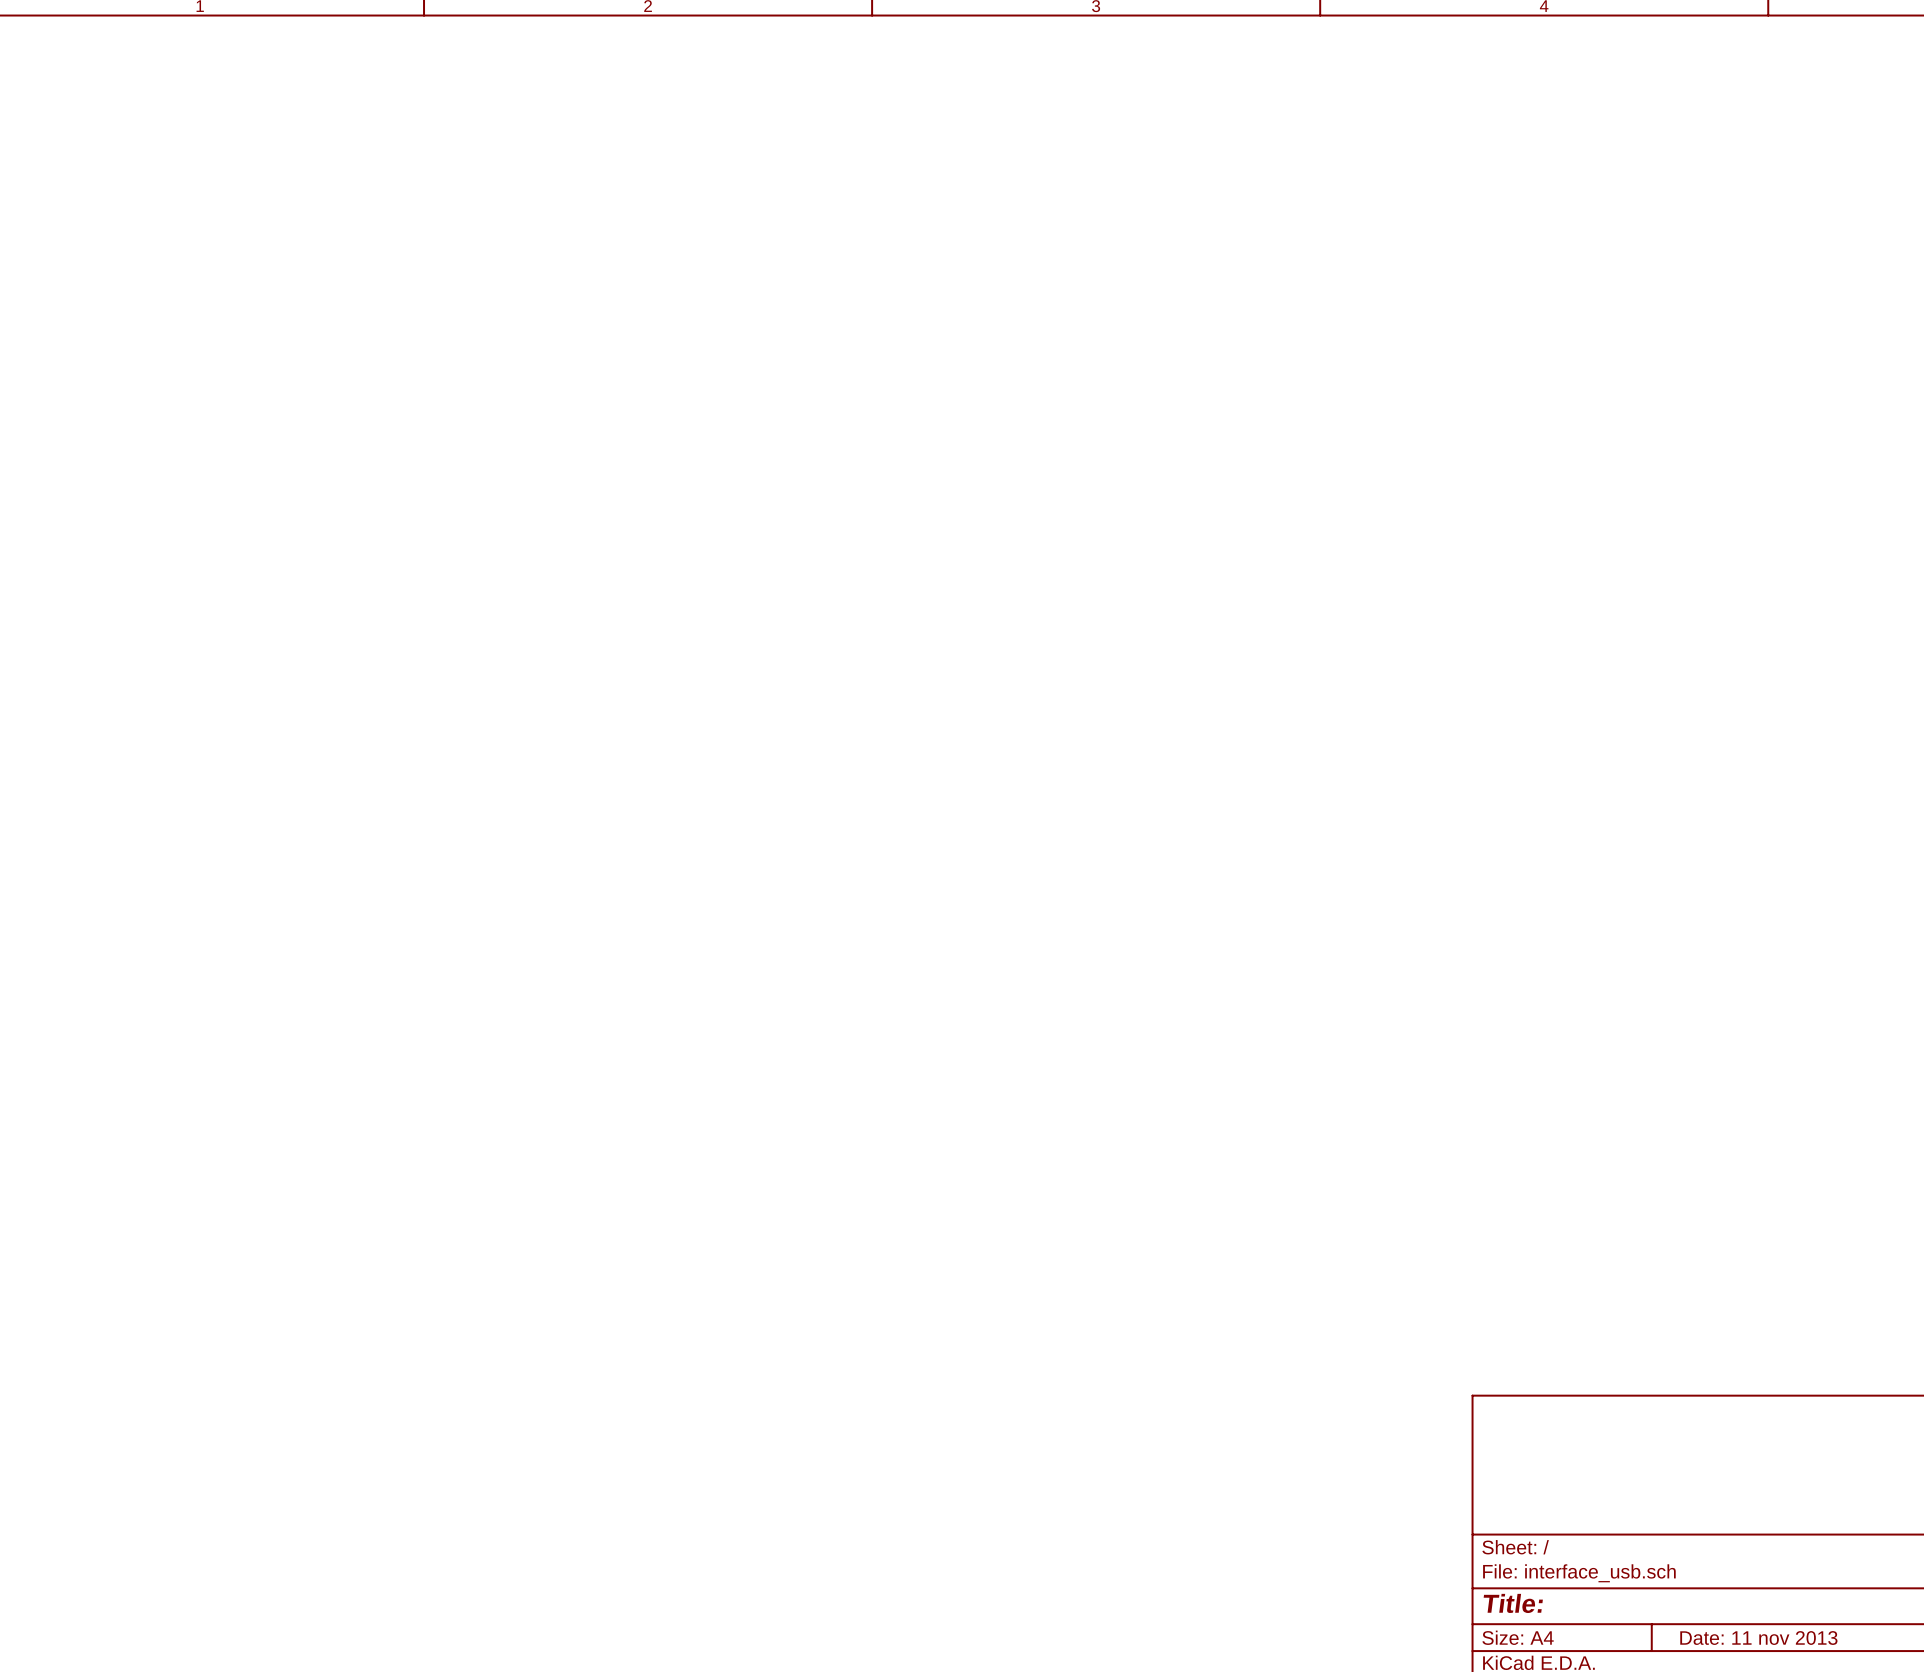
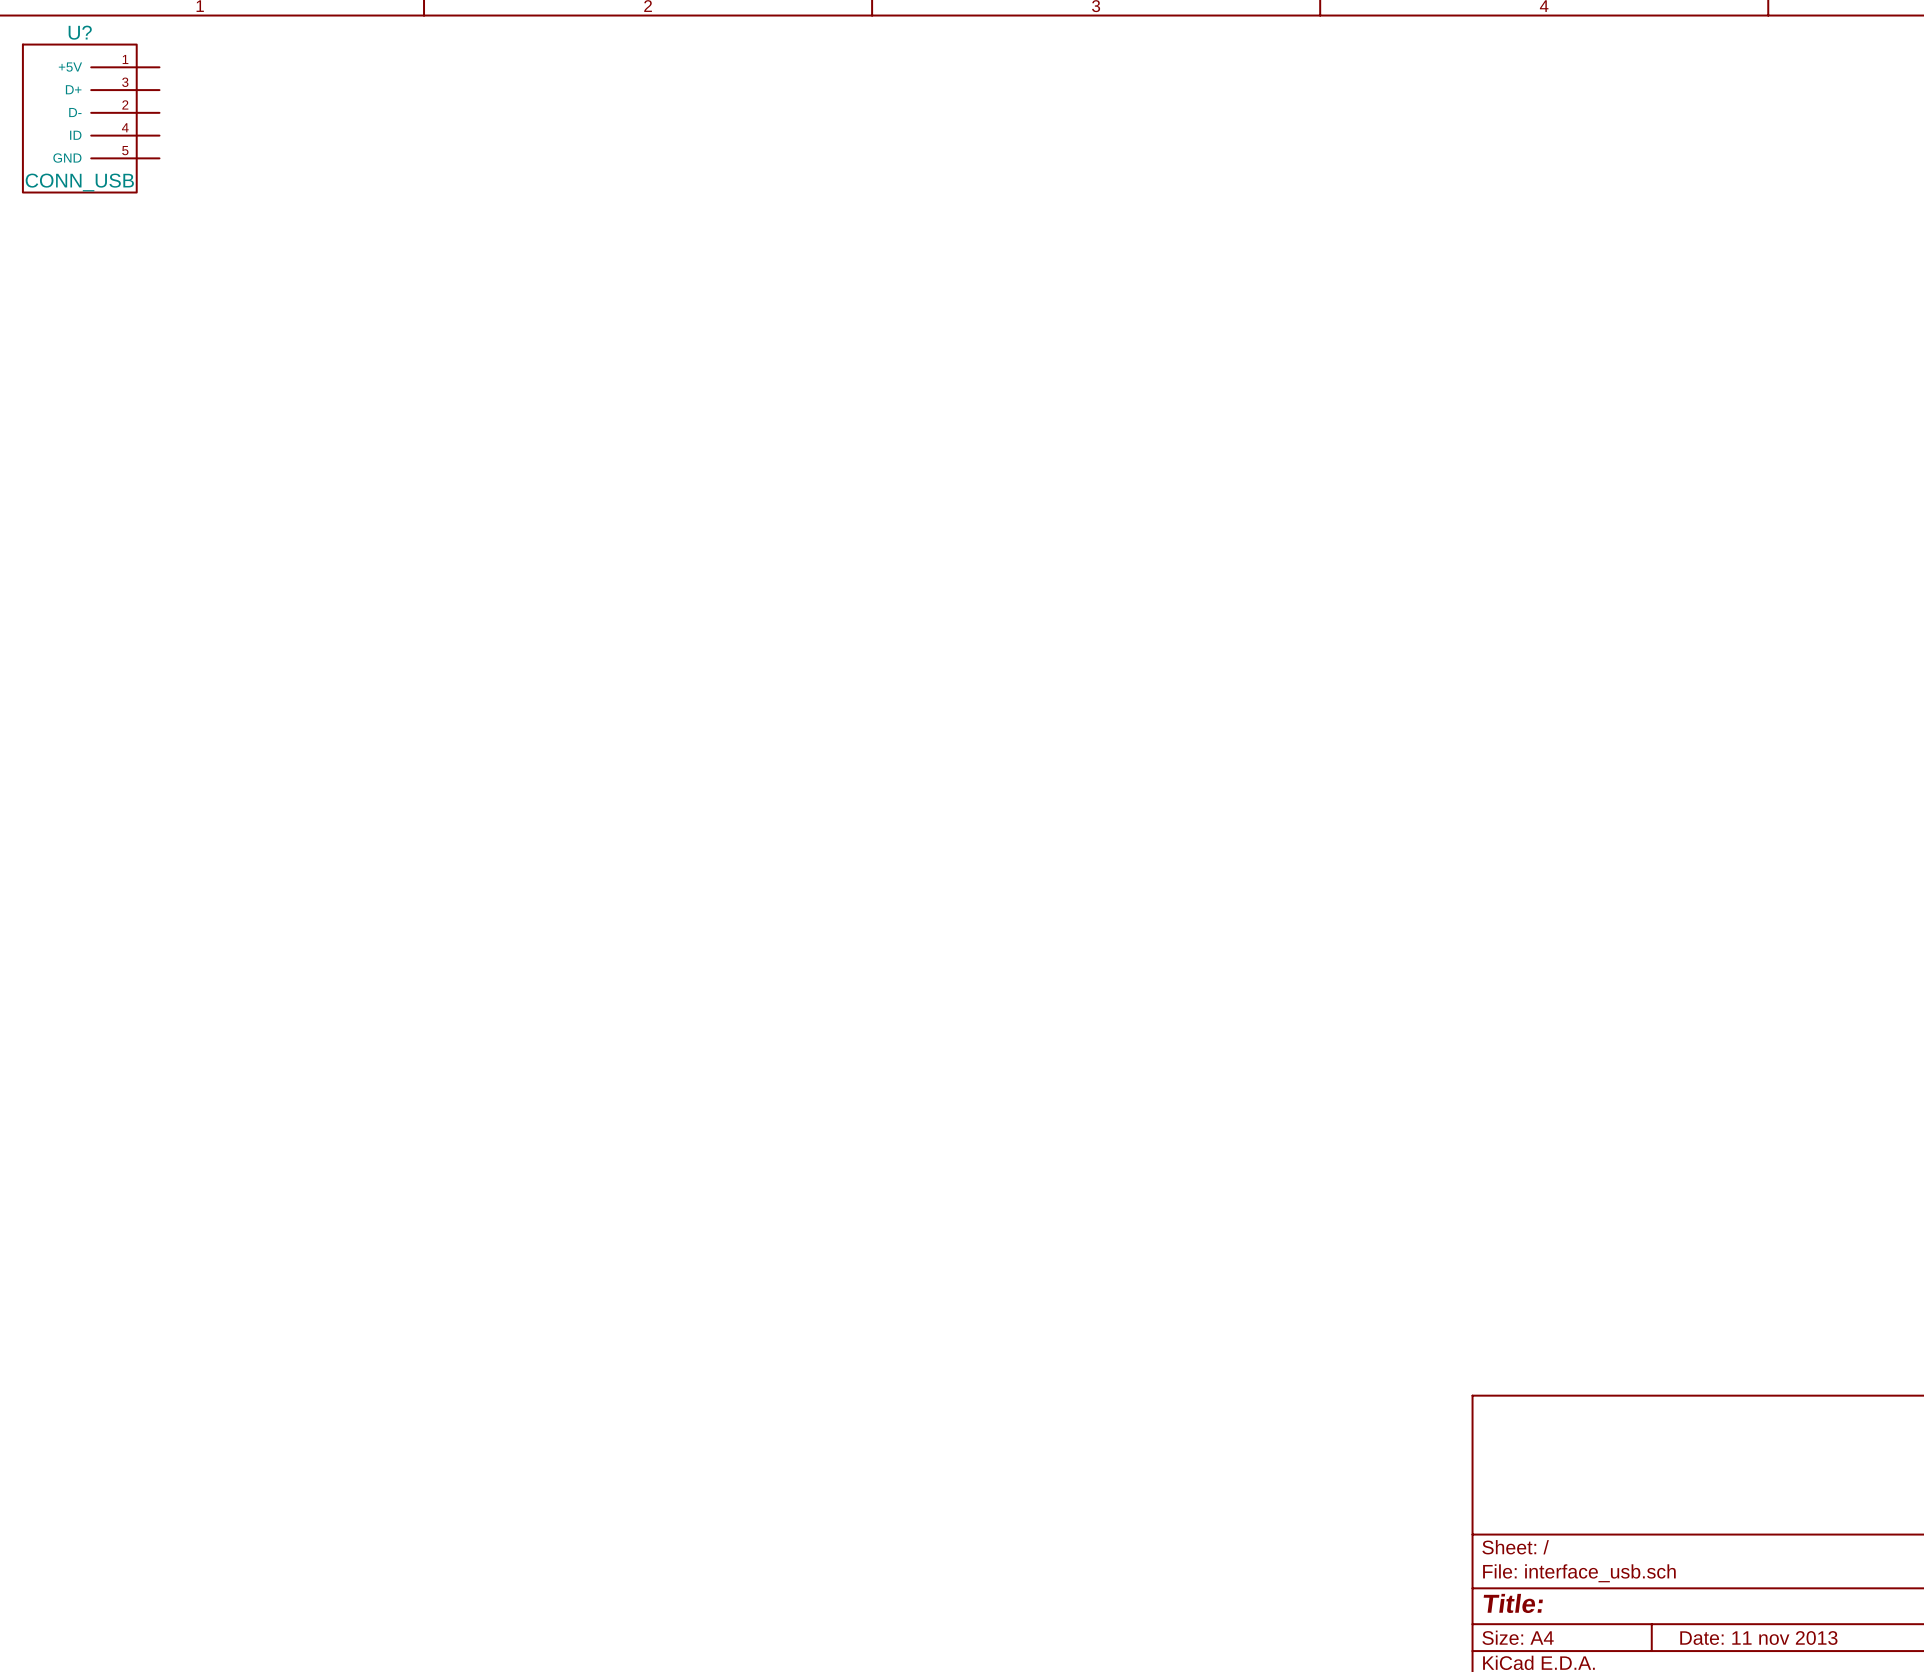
U?: none -> CONN_USB (91, 118)

